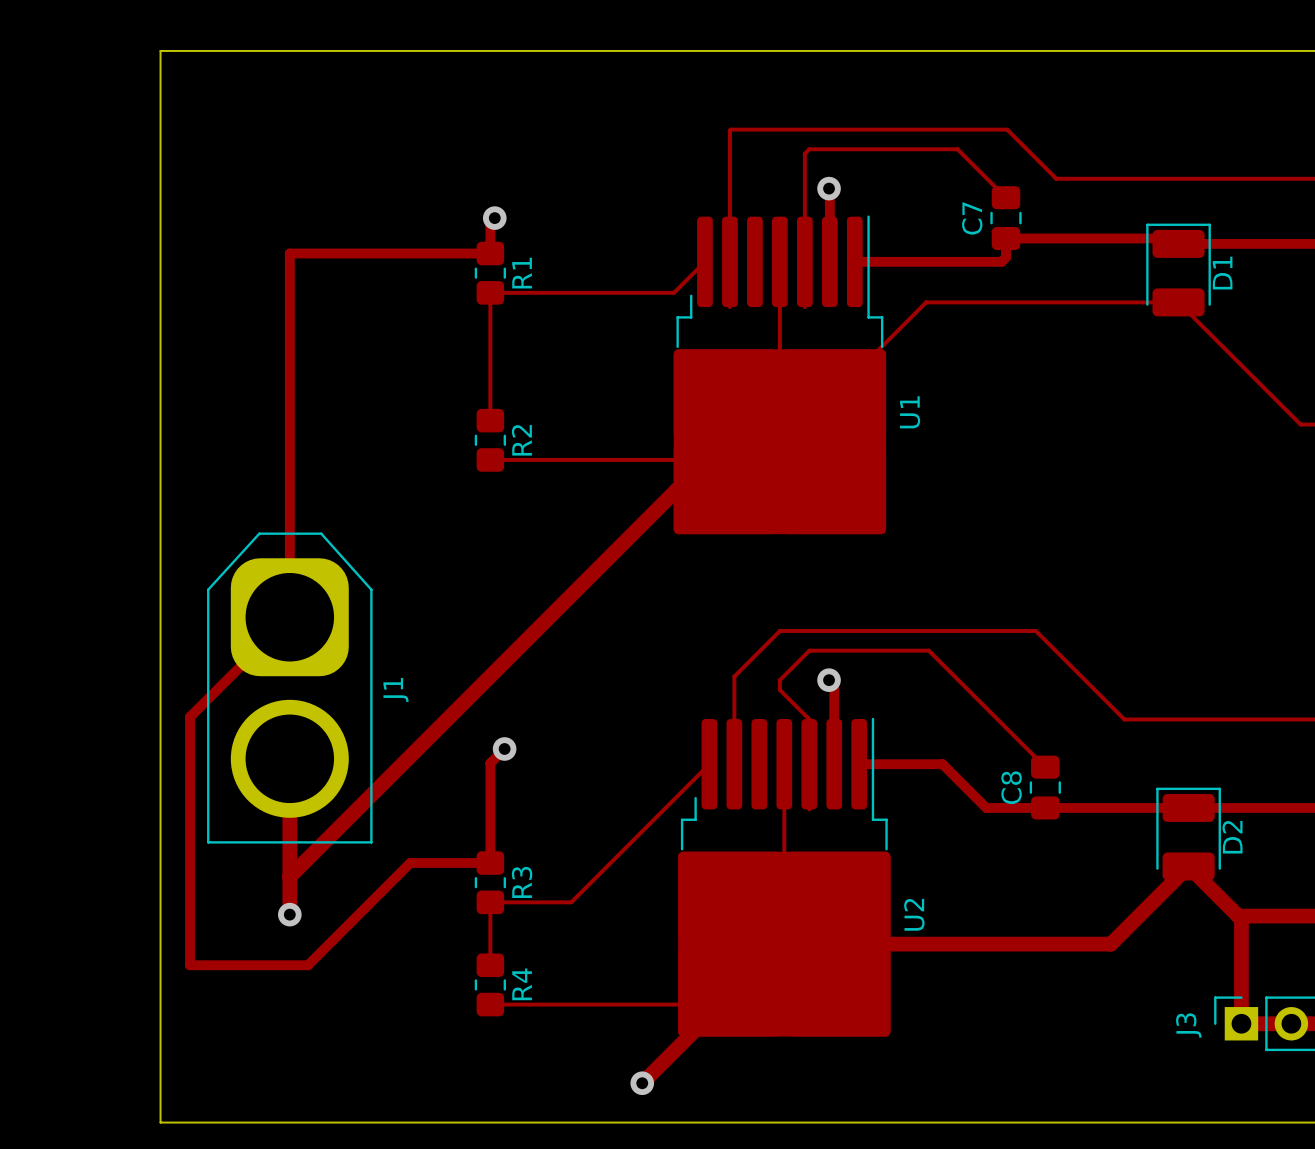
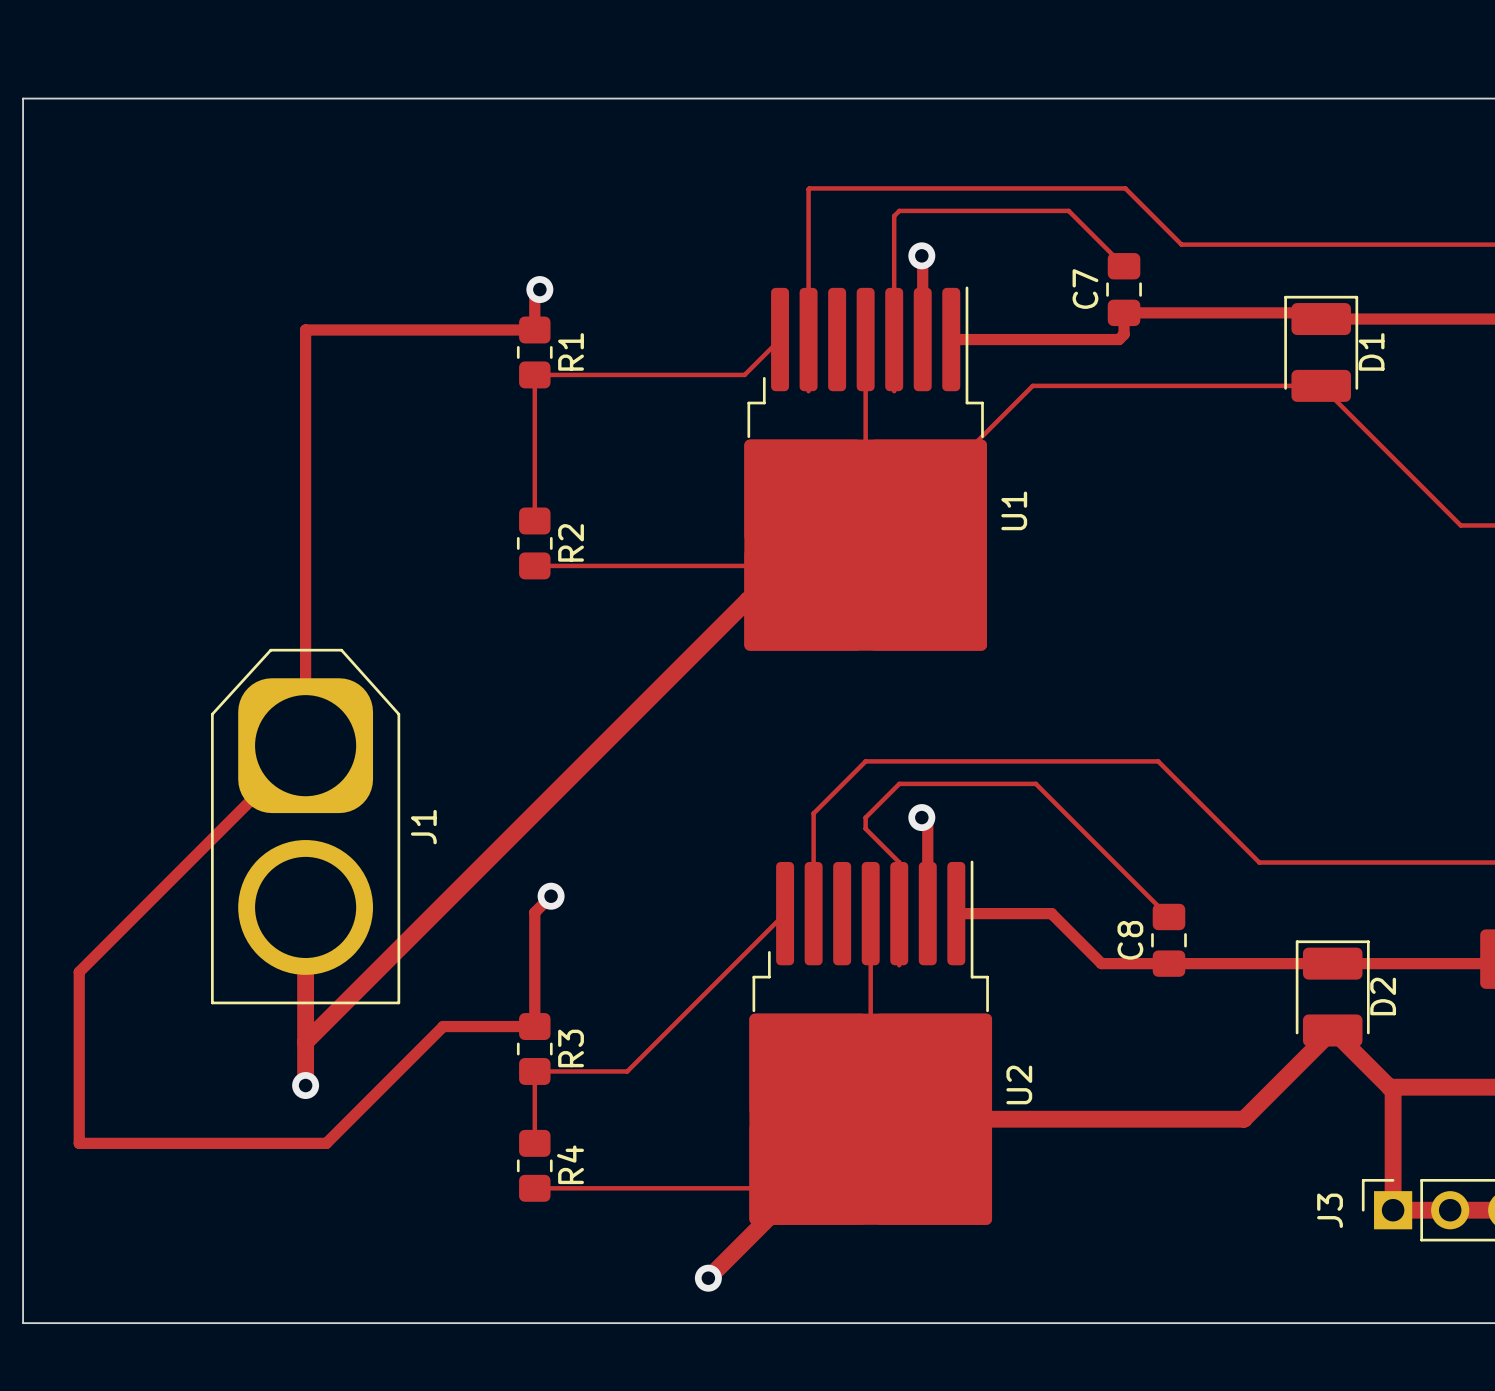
board edge: (160, 50) (160, 1122) -> (157, 98) (23, 98) (23, 1323) (157, 1323)
track: (190, 717) (190, 965) -> (191, 859) (79, 972) (79, 1143) (191, 1143)

